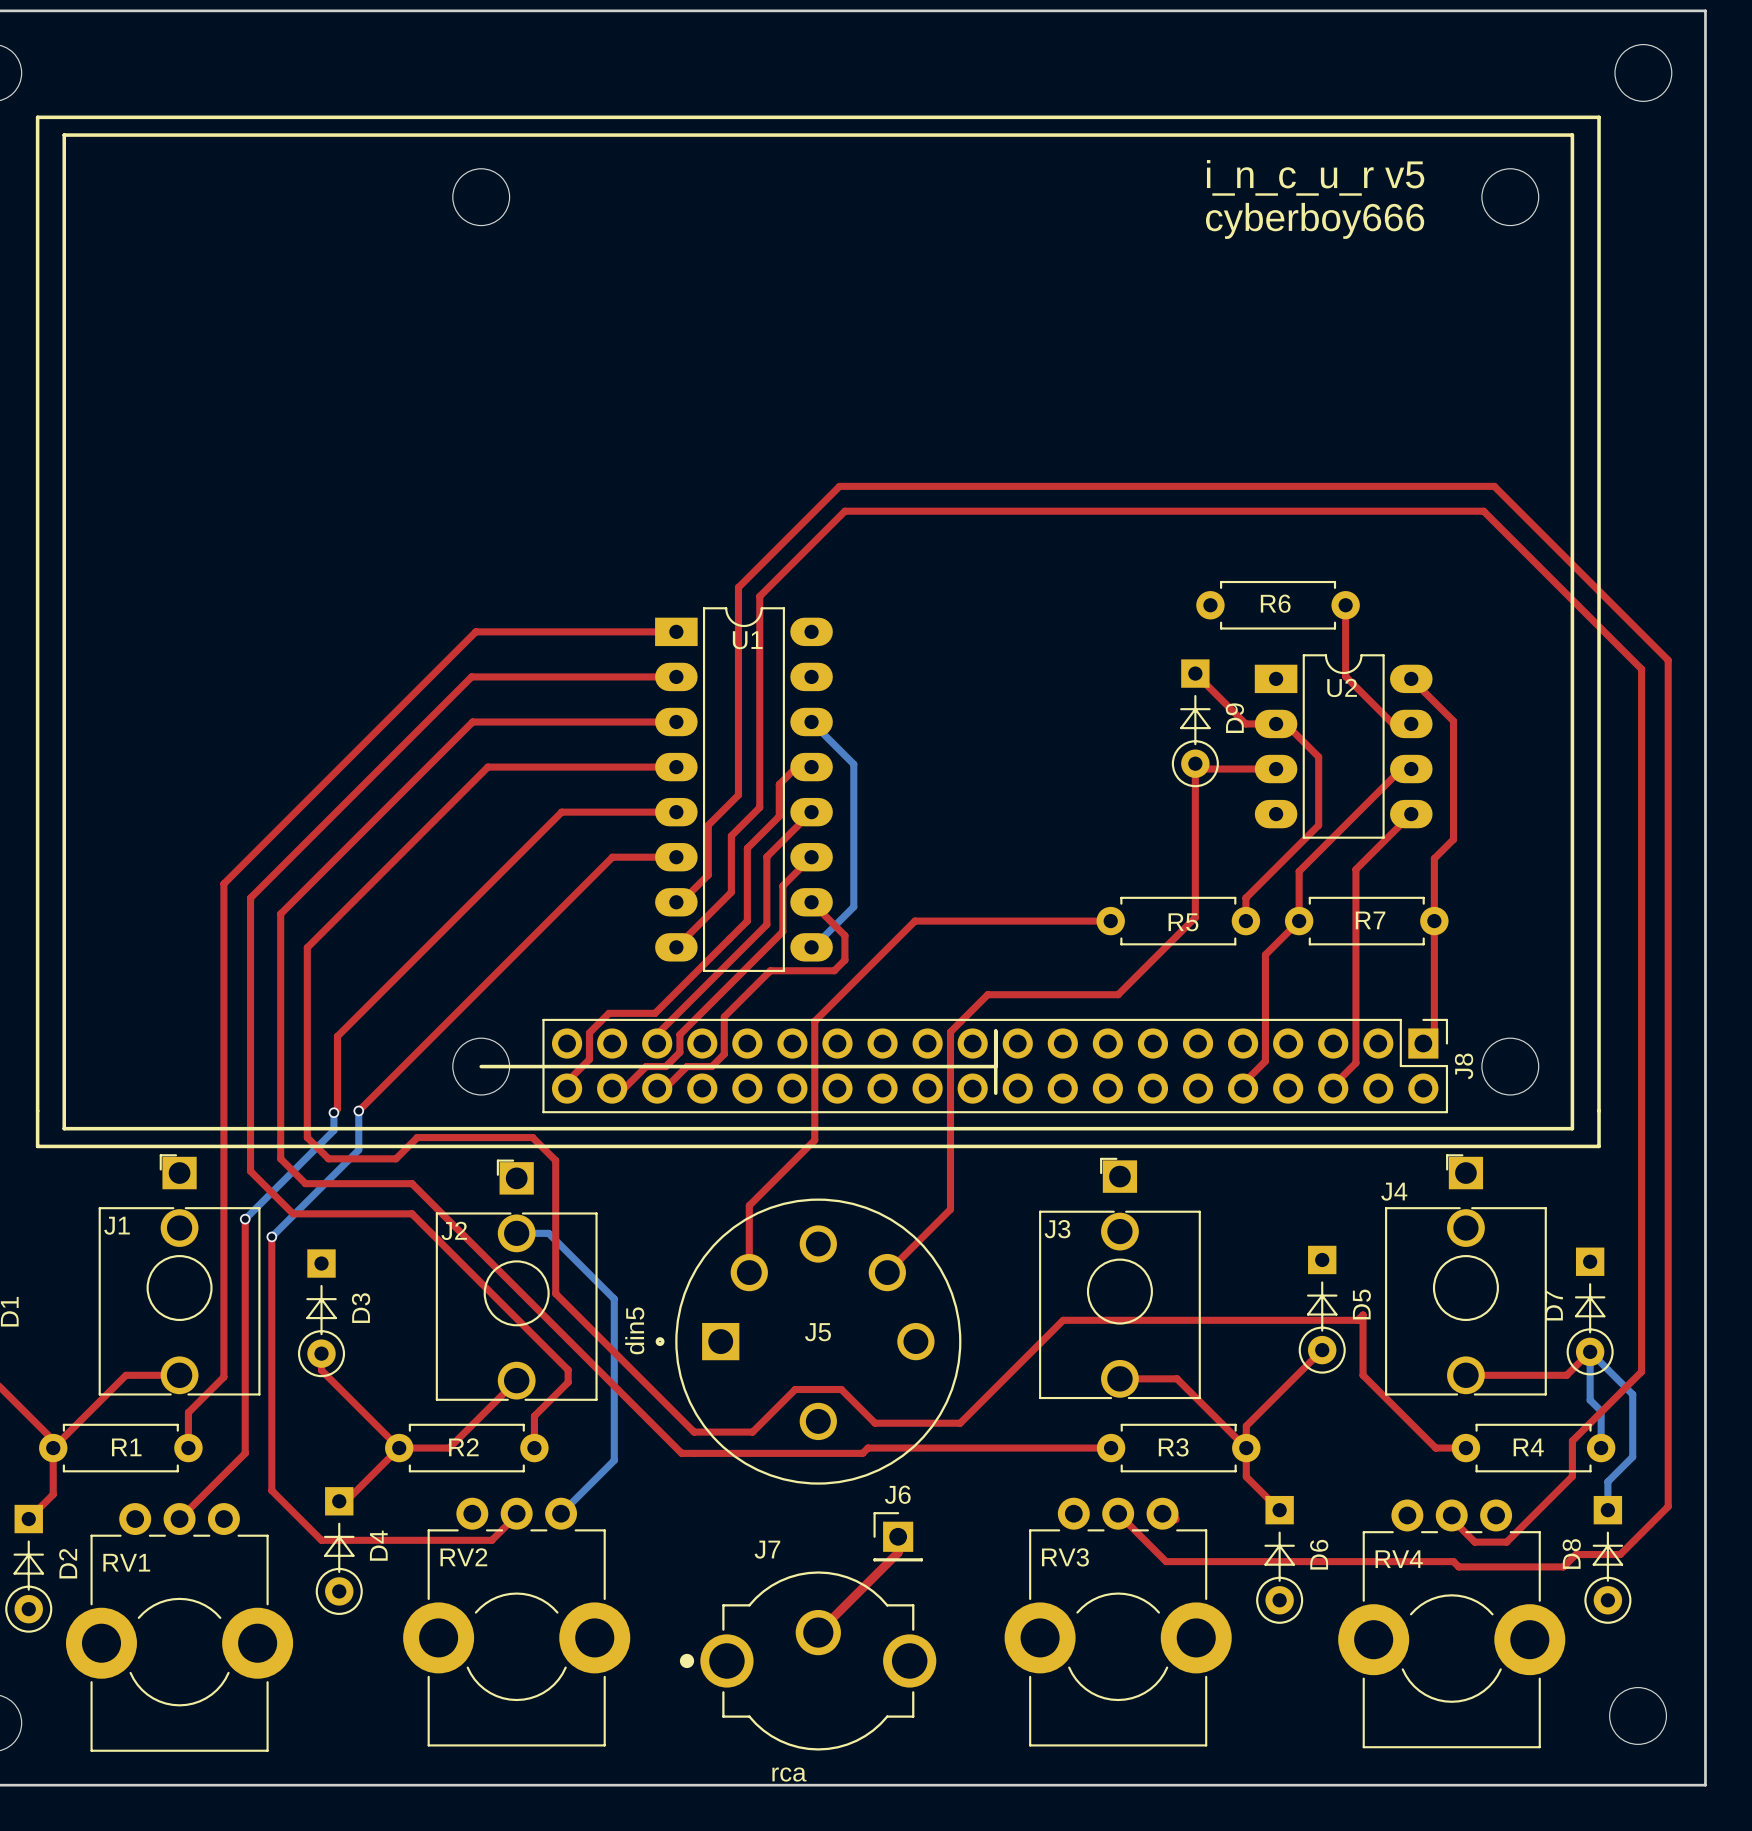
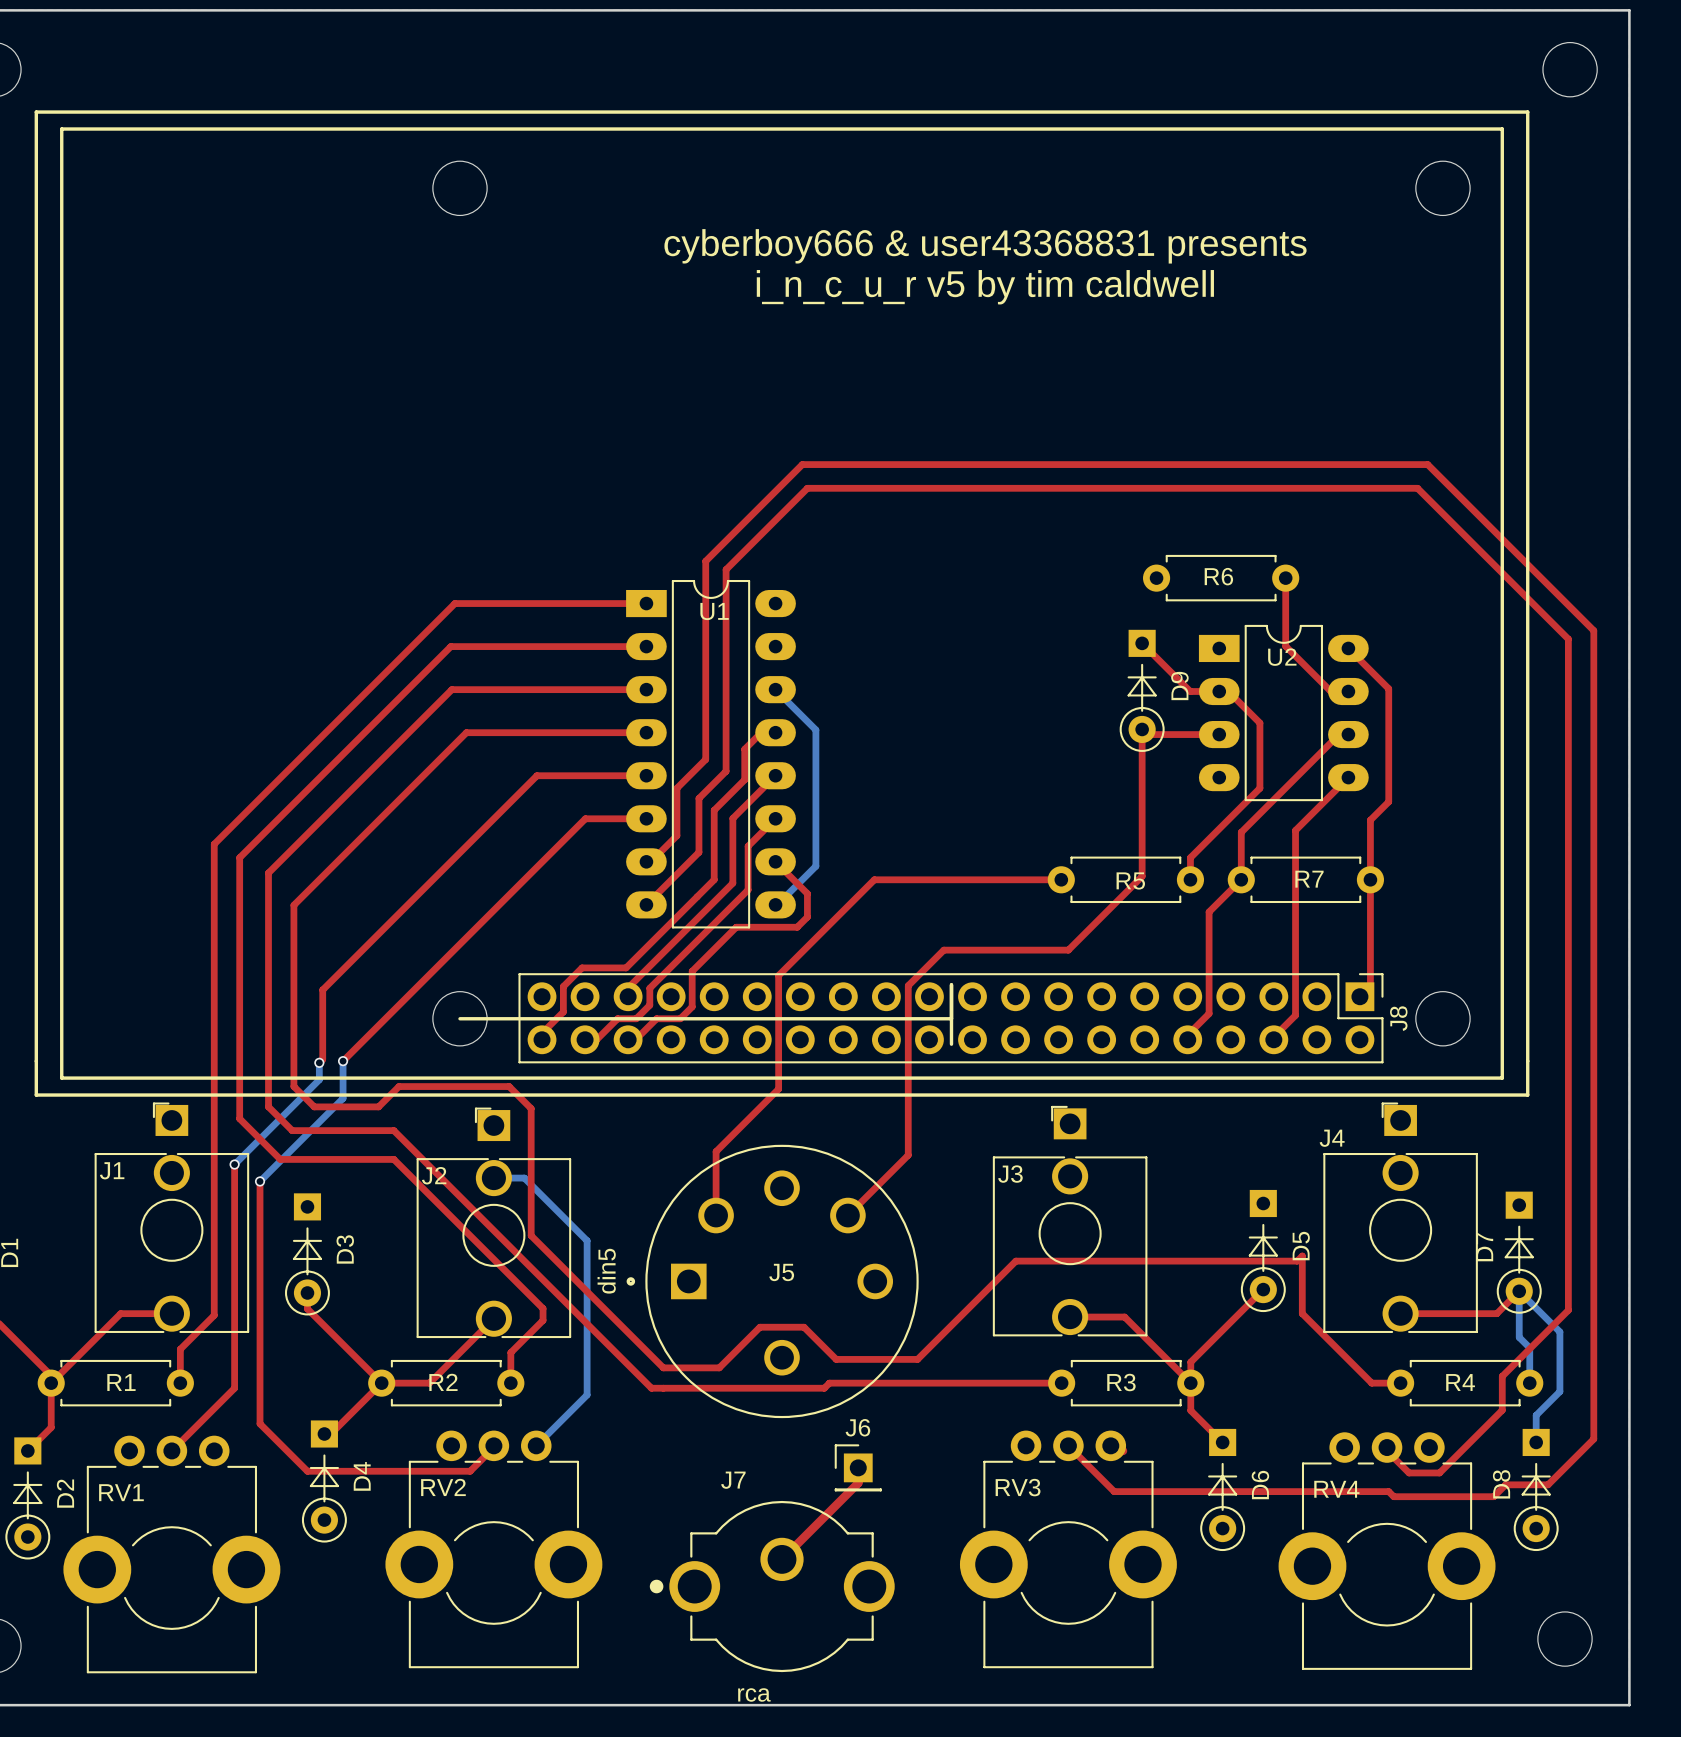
text: i_n_c_u_r v5 (1315, 177) -> none
text: cyberboy666 (1315, 220) -> none
text: none -> cyberboy666 & user43368831 presents (985, 246)
text: none -> i_n_c_u_r v5 by tim caldwell (985, 287)

